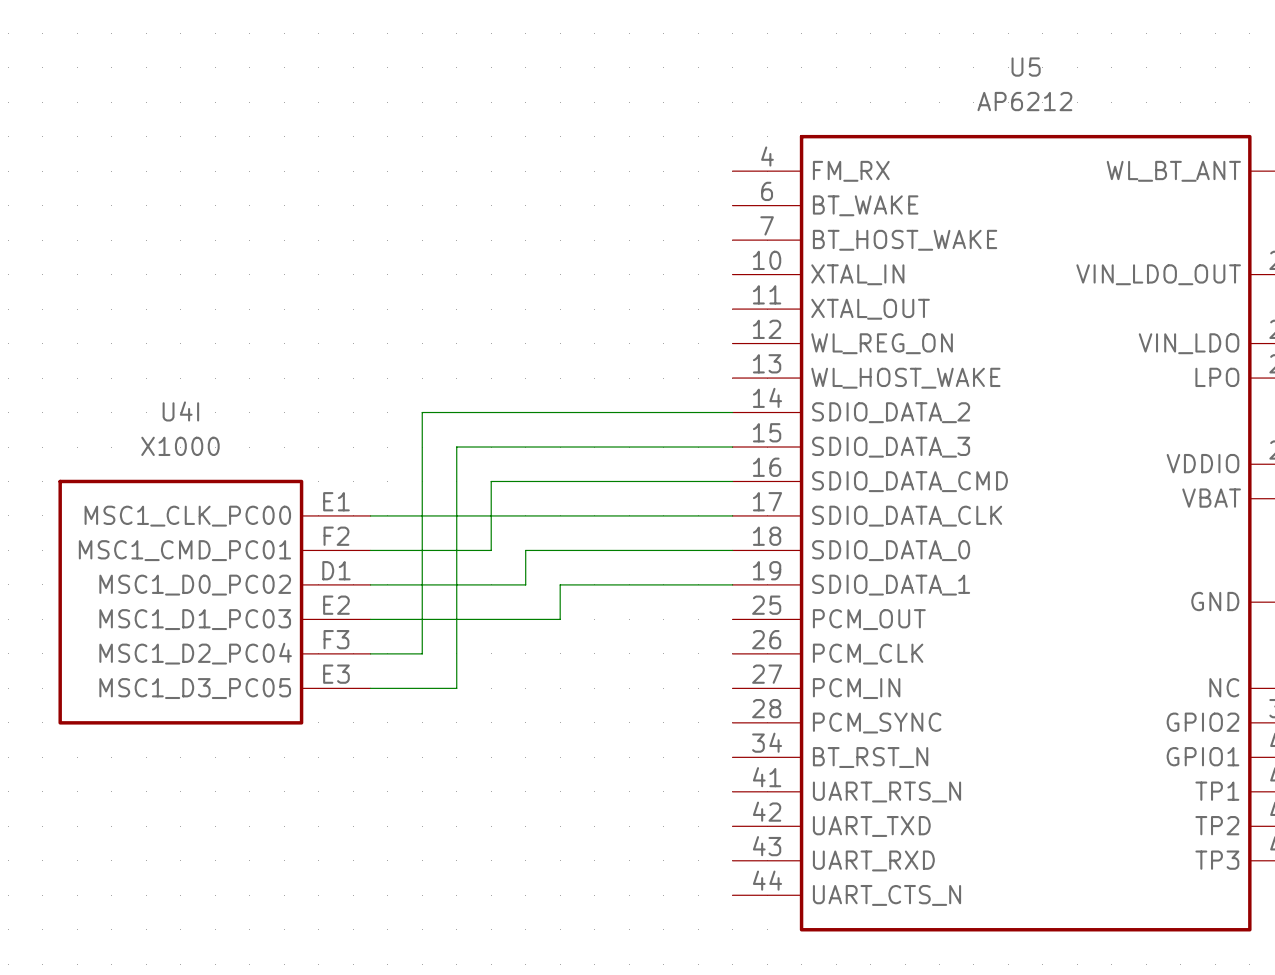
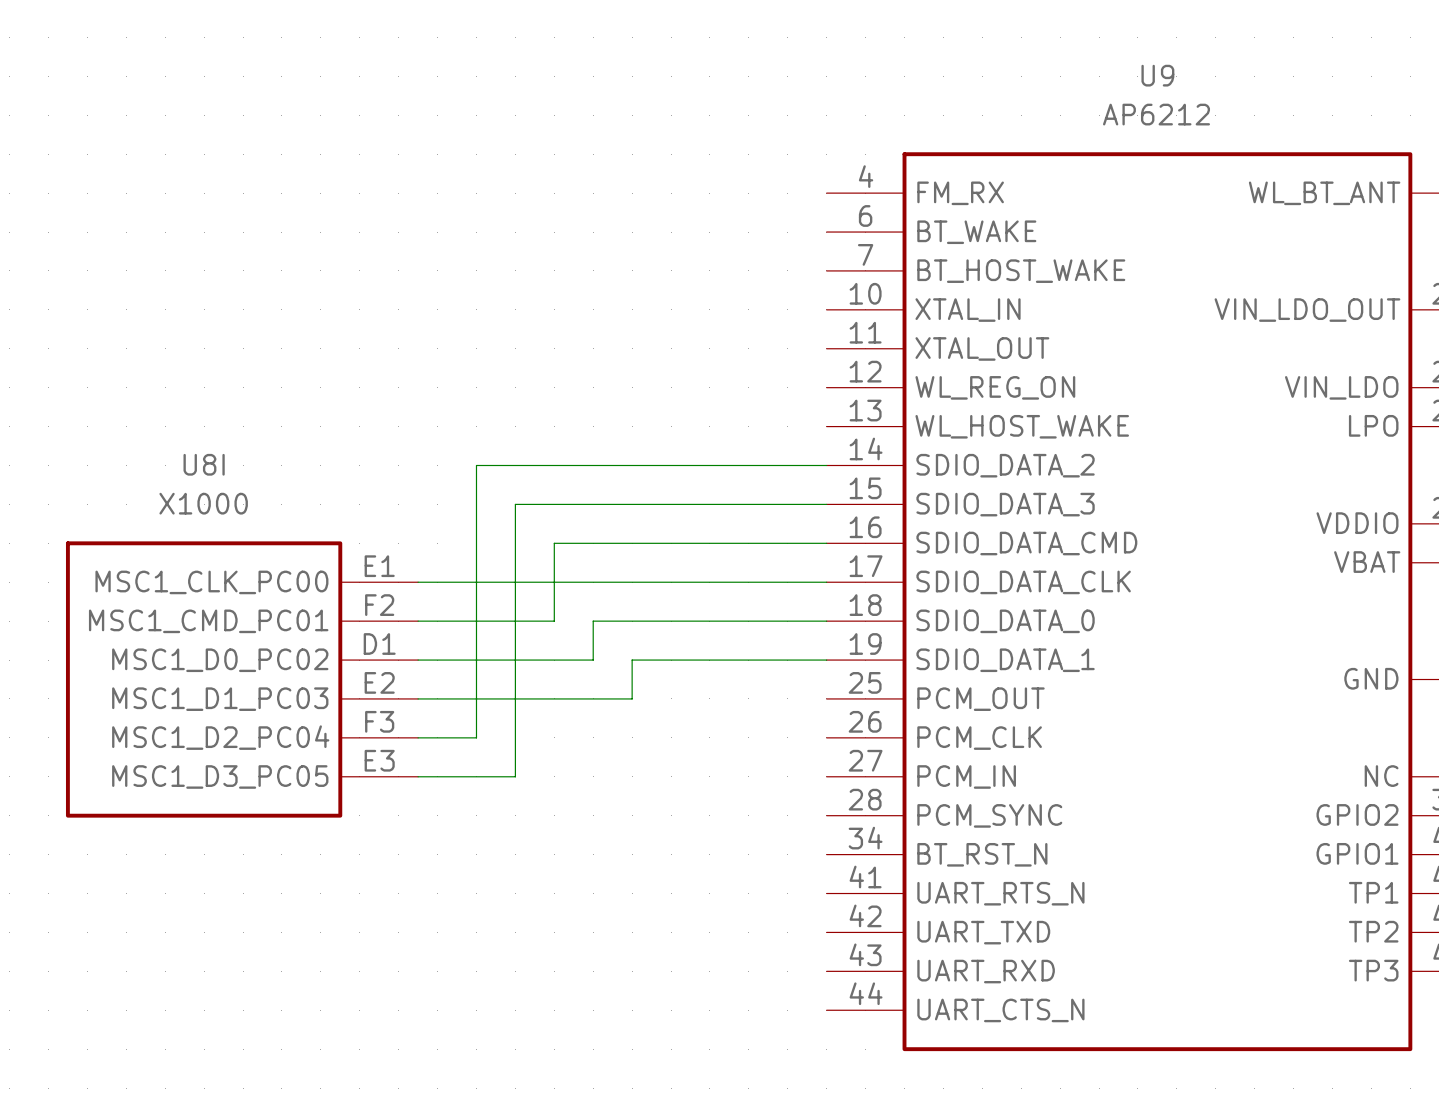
U5 name: U5 (1026, 67) -> U9 (1157, 75)
U4I name: U4I (180, 411) -> U8I (204, 464)

